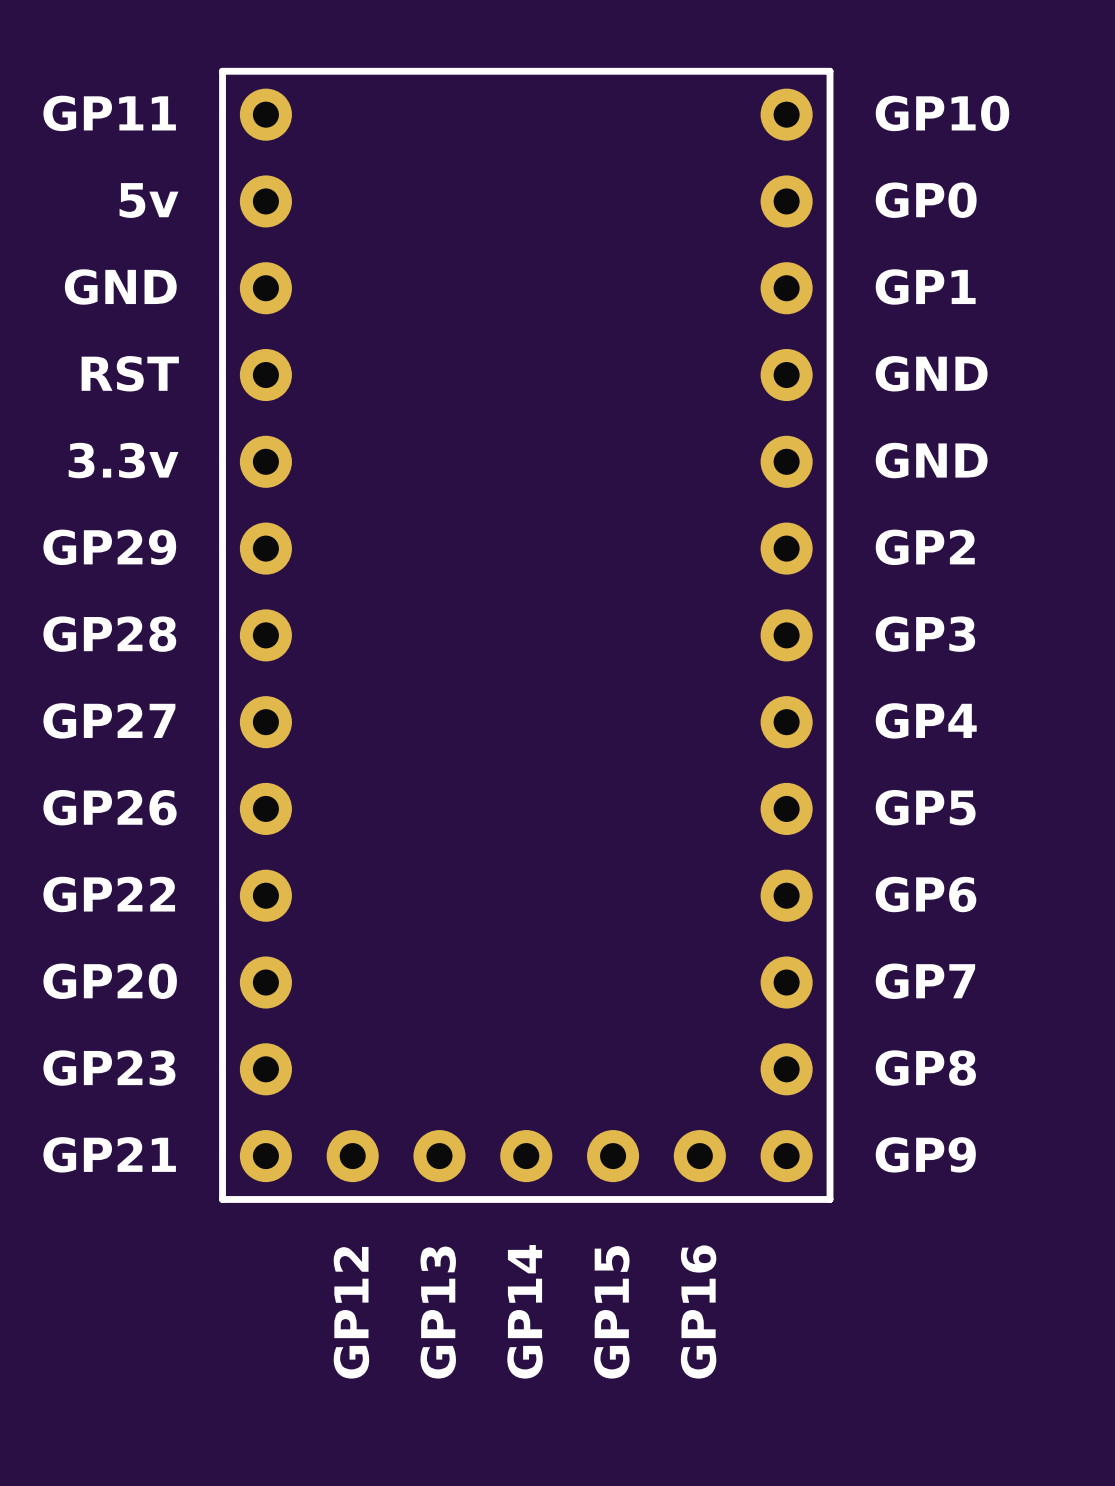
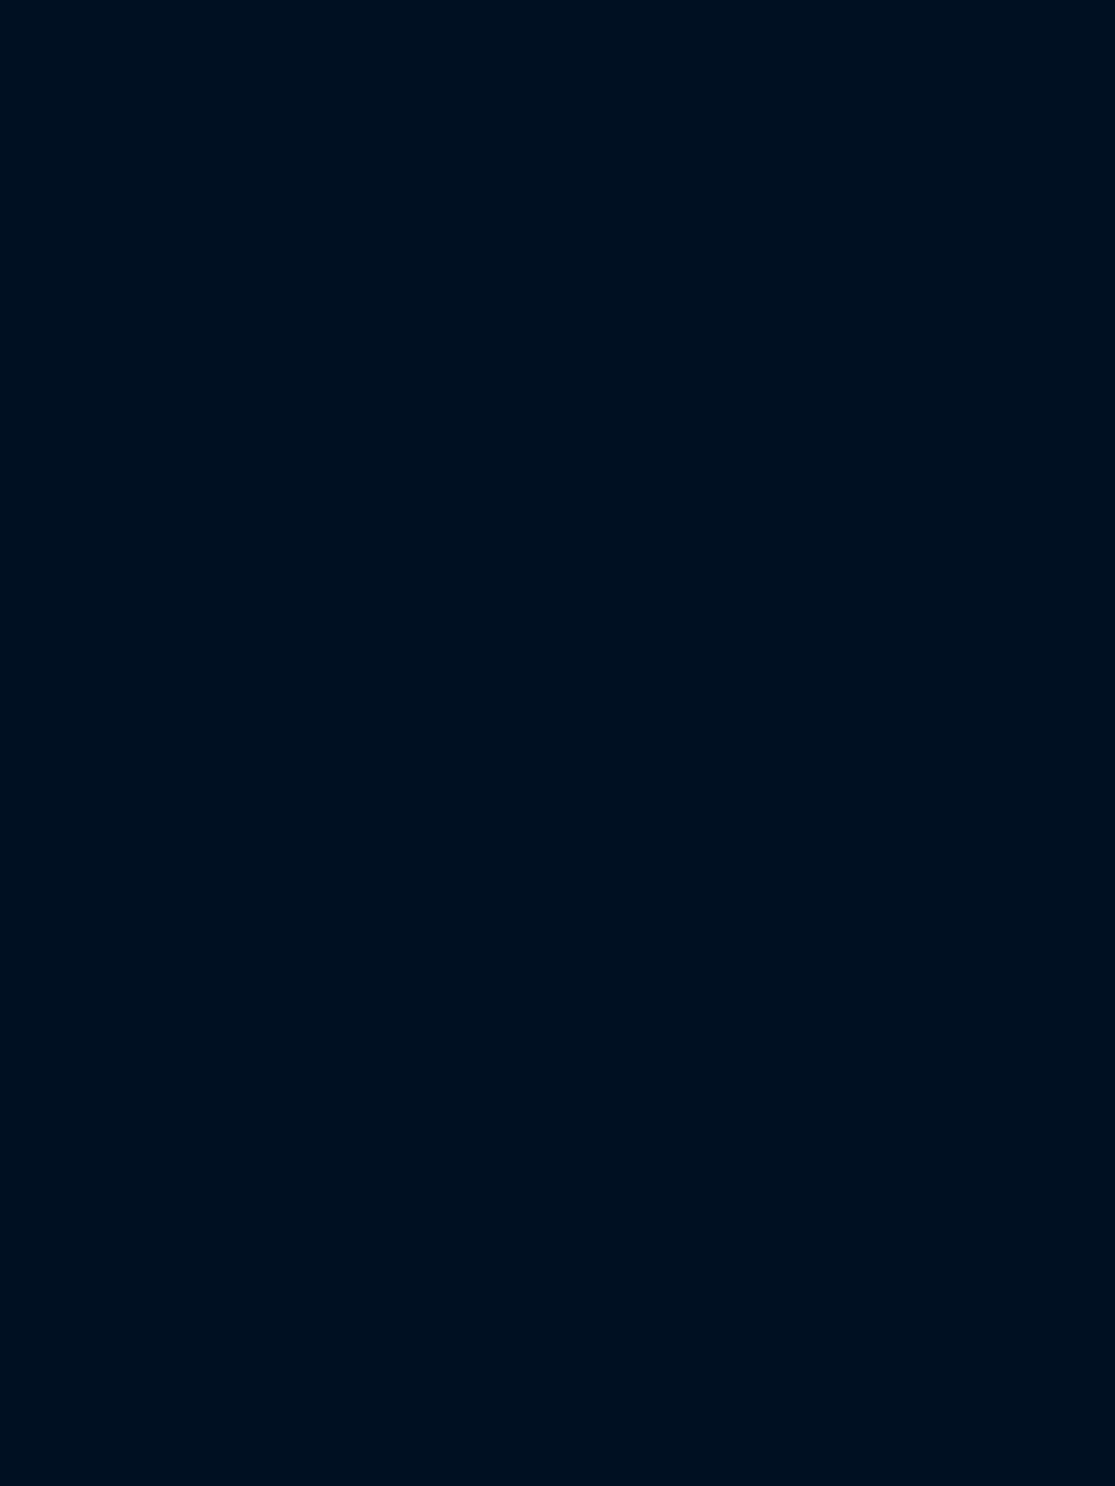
part: (526, 635) -> none

